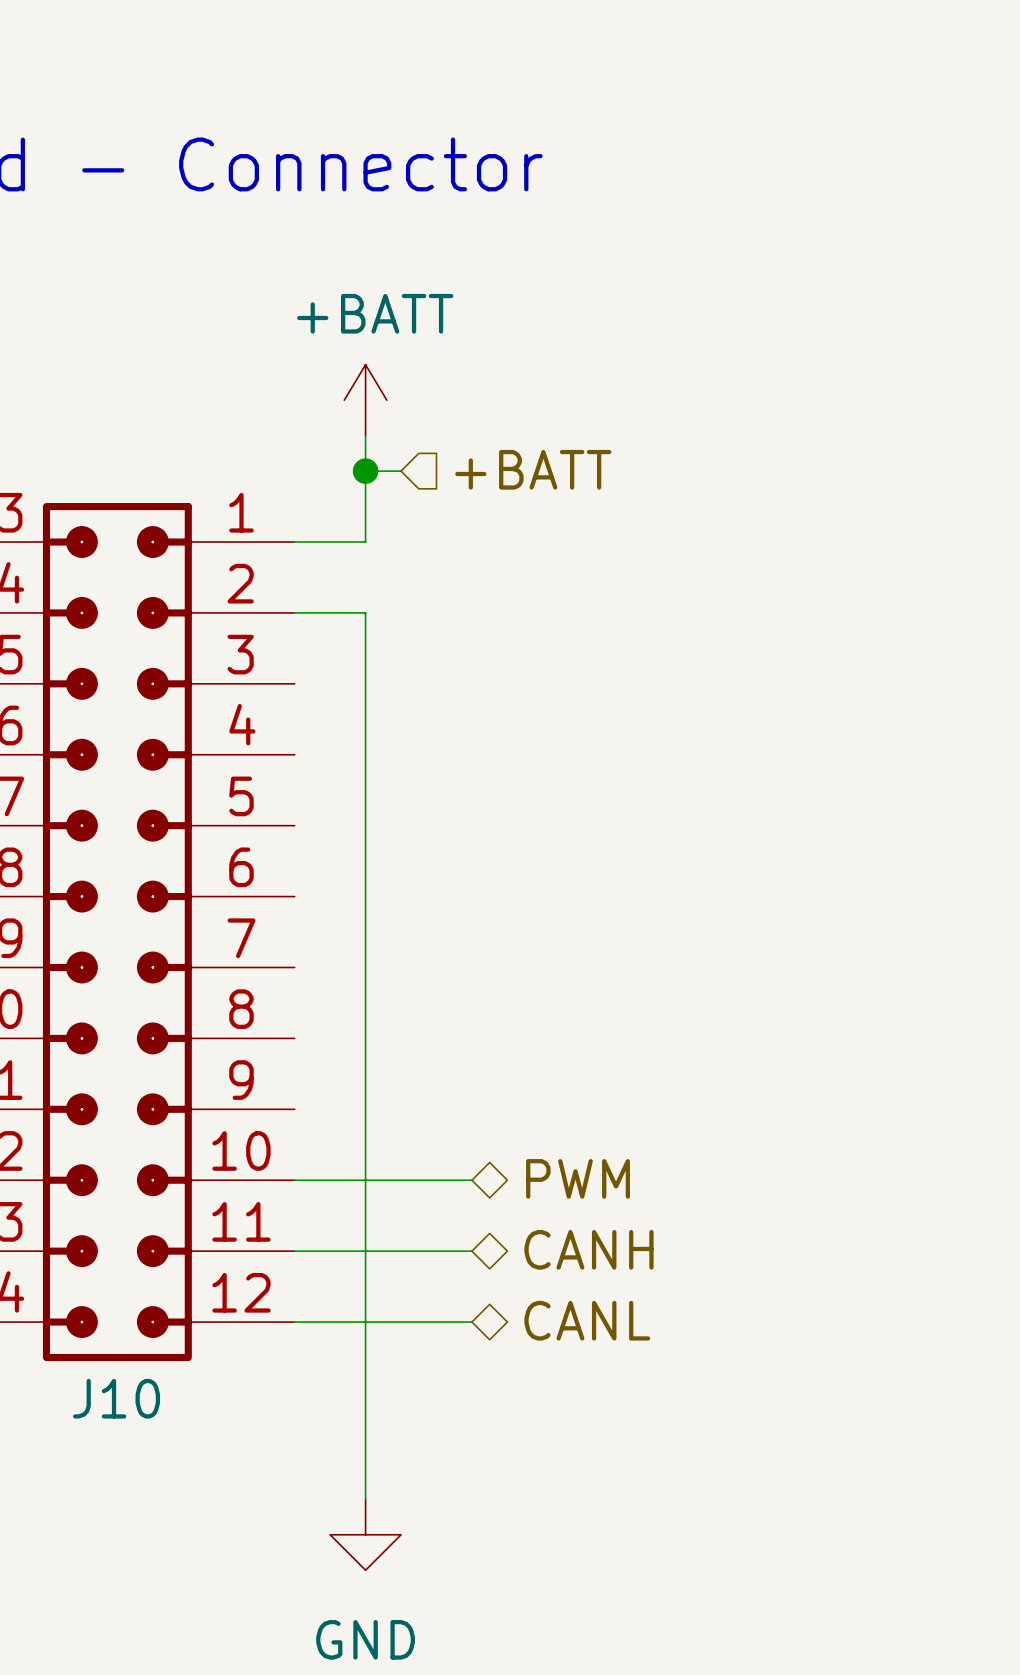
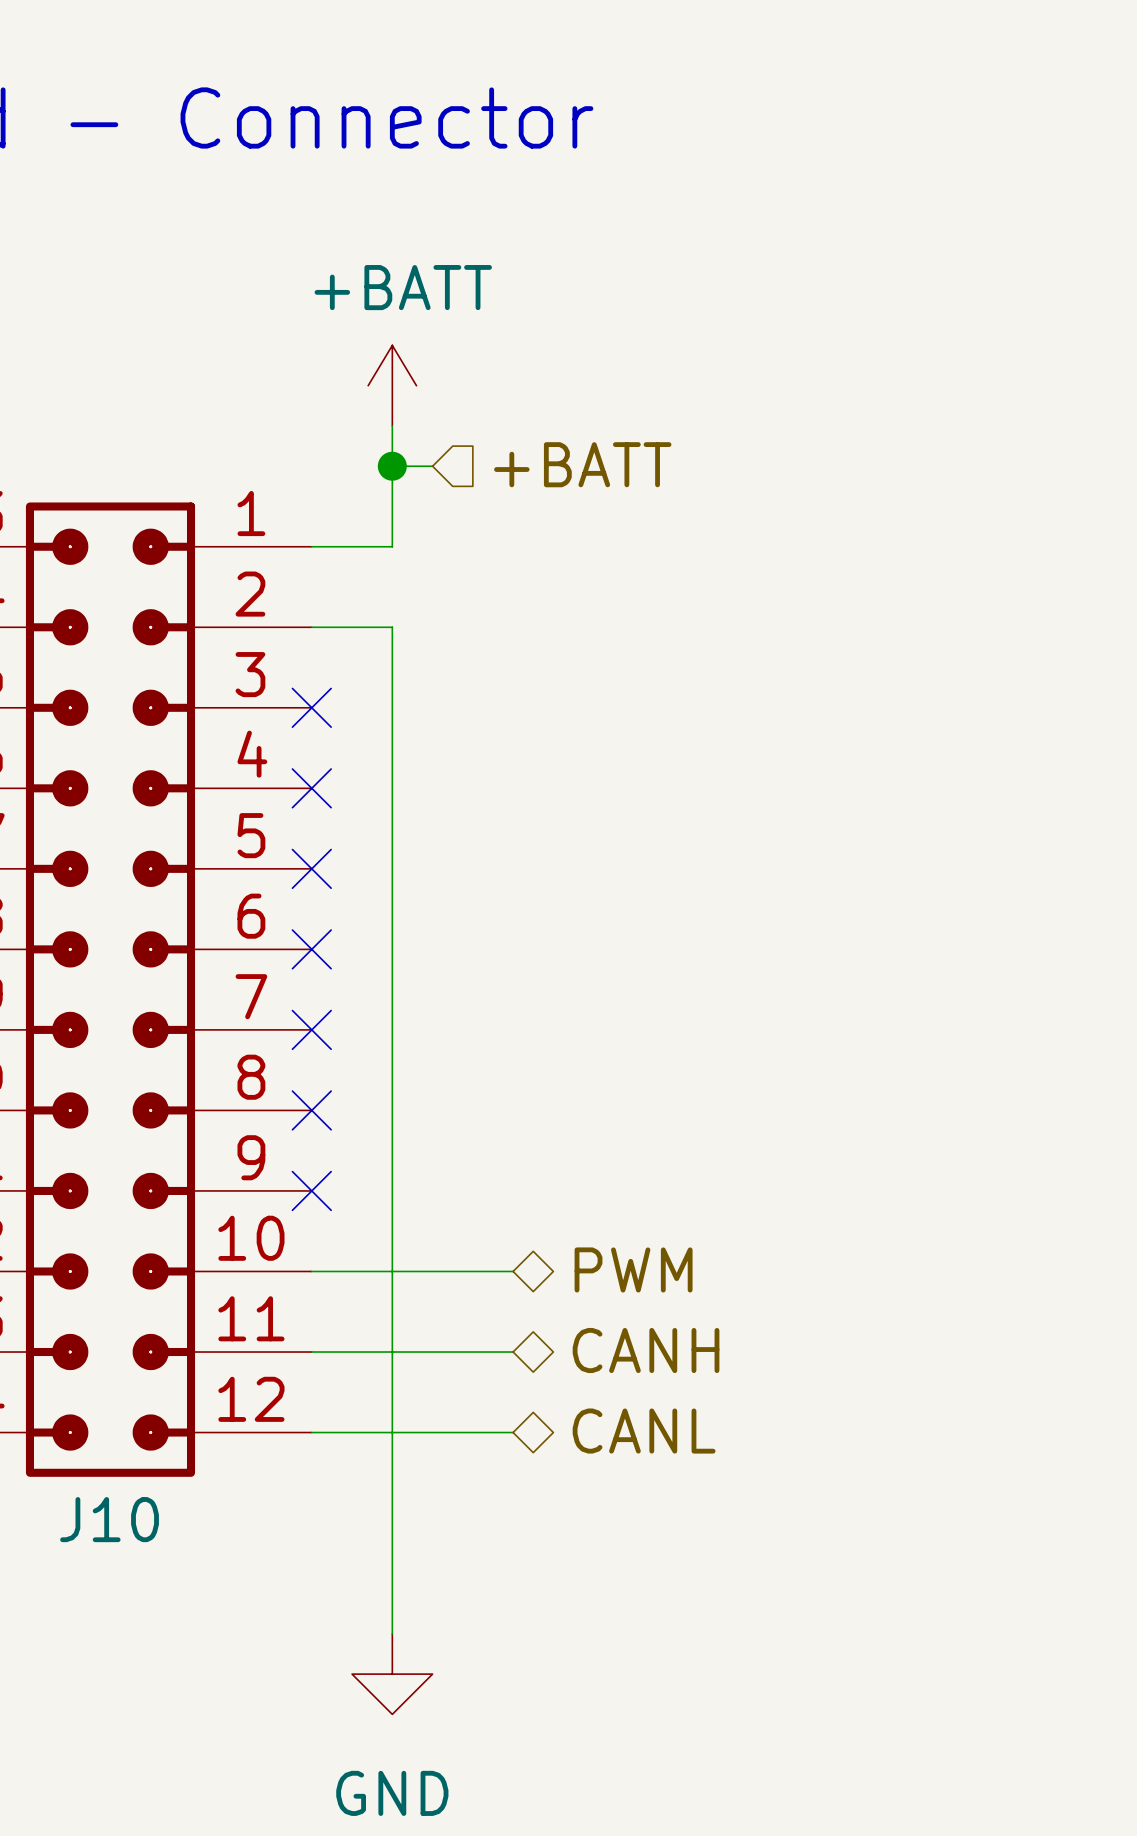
no-connect mark: none -> (311, 707)
no-connect mark: none -> (311, 788)
no-connect mark: none -> (311, 868)
no-connect mark: none -> (311, 949)
no-connect mark: none -> (311, 1029)
no-connect mark: none -> (311, 1110)
no-connect mark: none -> (311, 1190)

